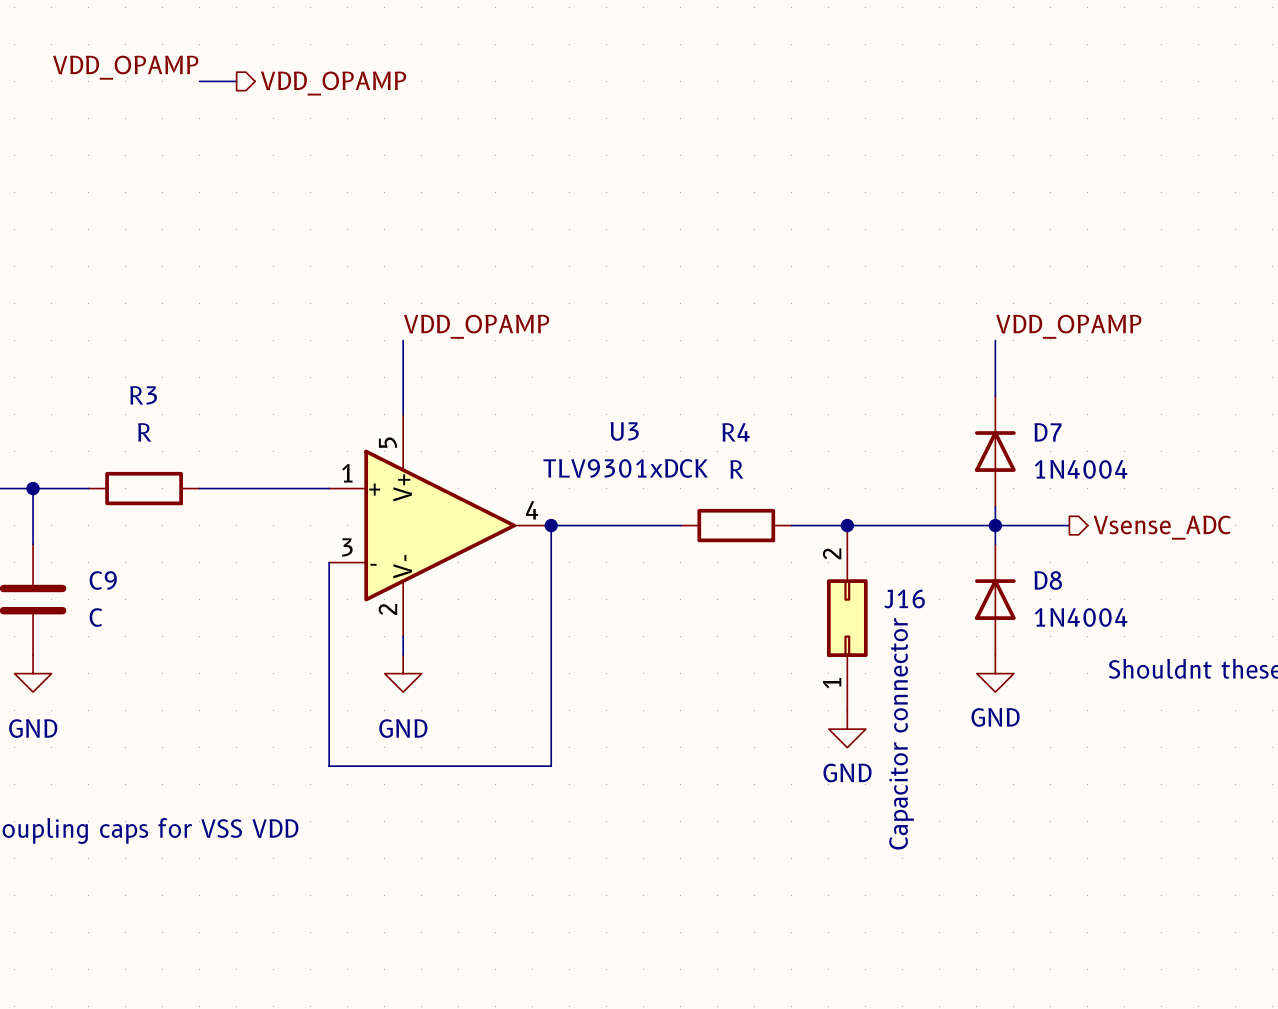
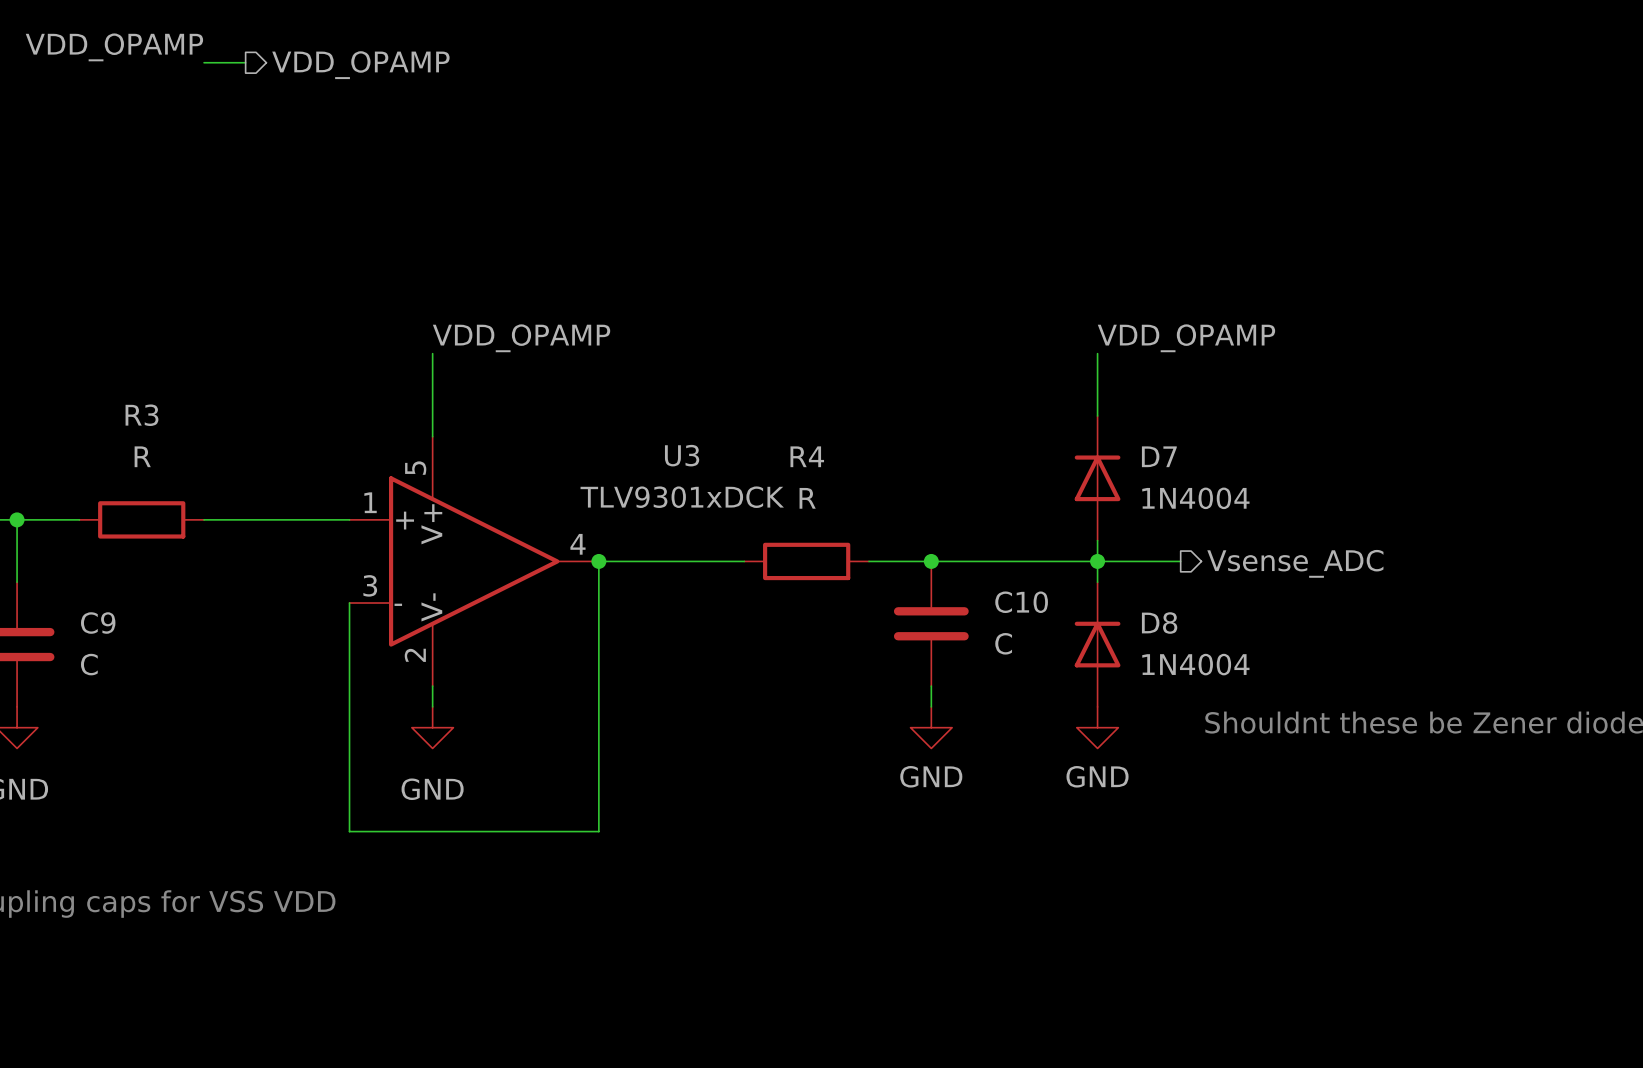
C10: none -> C (931, 623)
J16: Capacitor connector (847, 618) -> none
power symbol position: GND (847, 729) -> GND (931, 727)

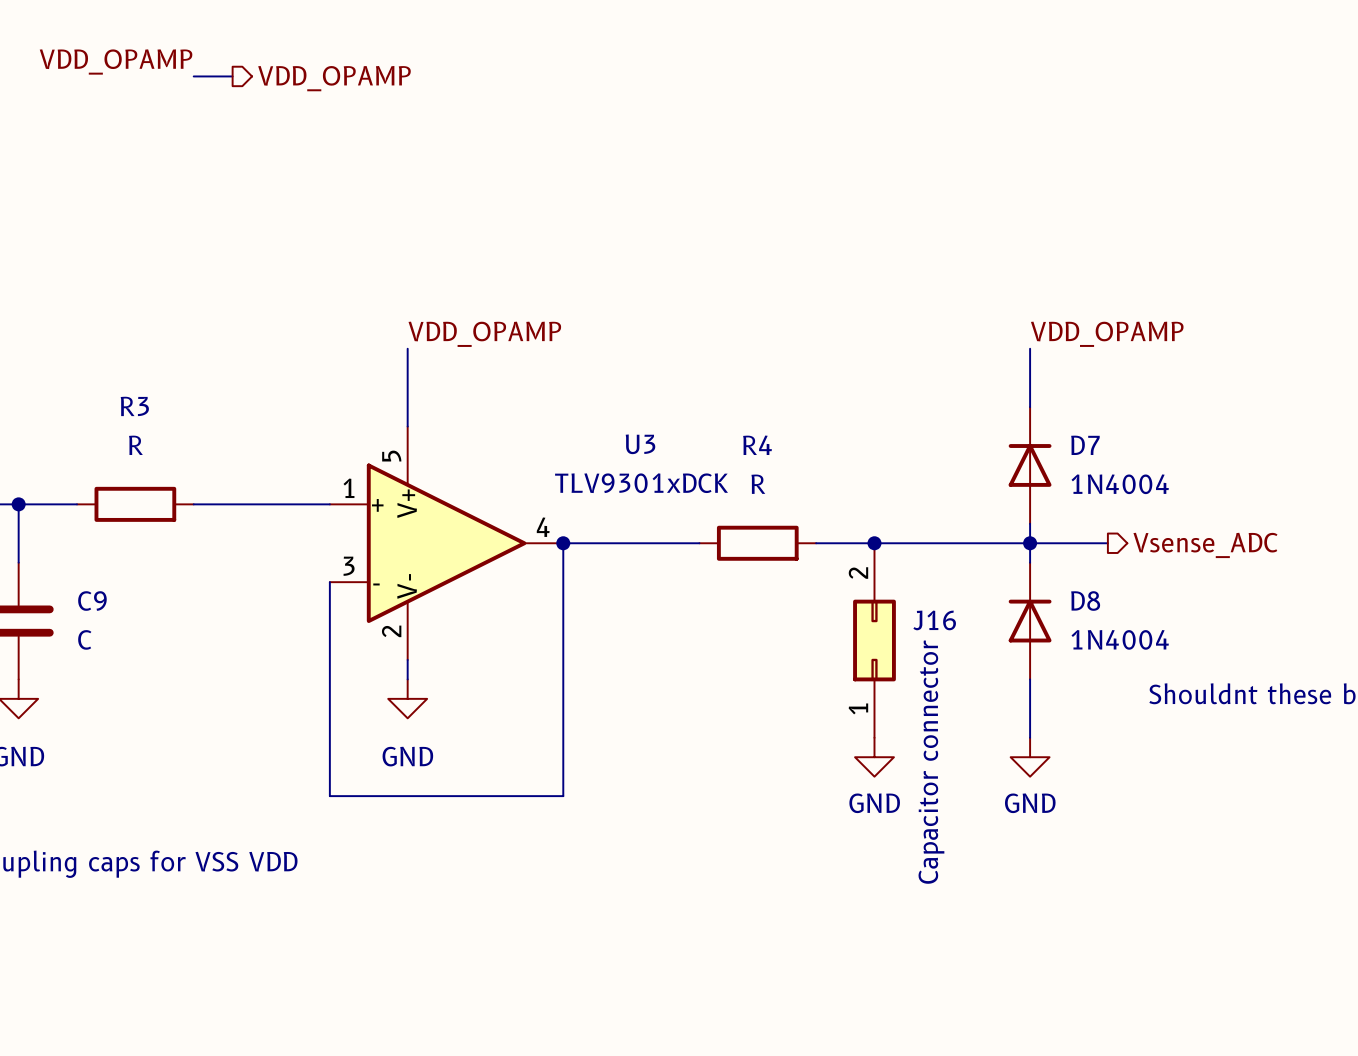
C10: C (931, 623) -> none
J16: none -> Capacitor connector (874, 640)
wire: none -> (1030, 679) (1030, 737)
power symbol position: GND (931, 727) -> GND (874, 757)
power symbol position: GND (1097, 727) -> GND (1030, 757)

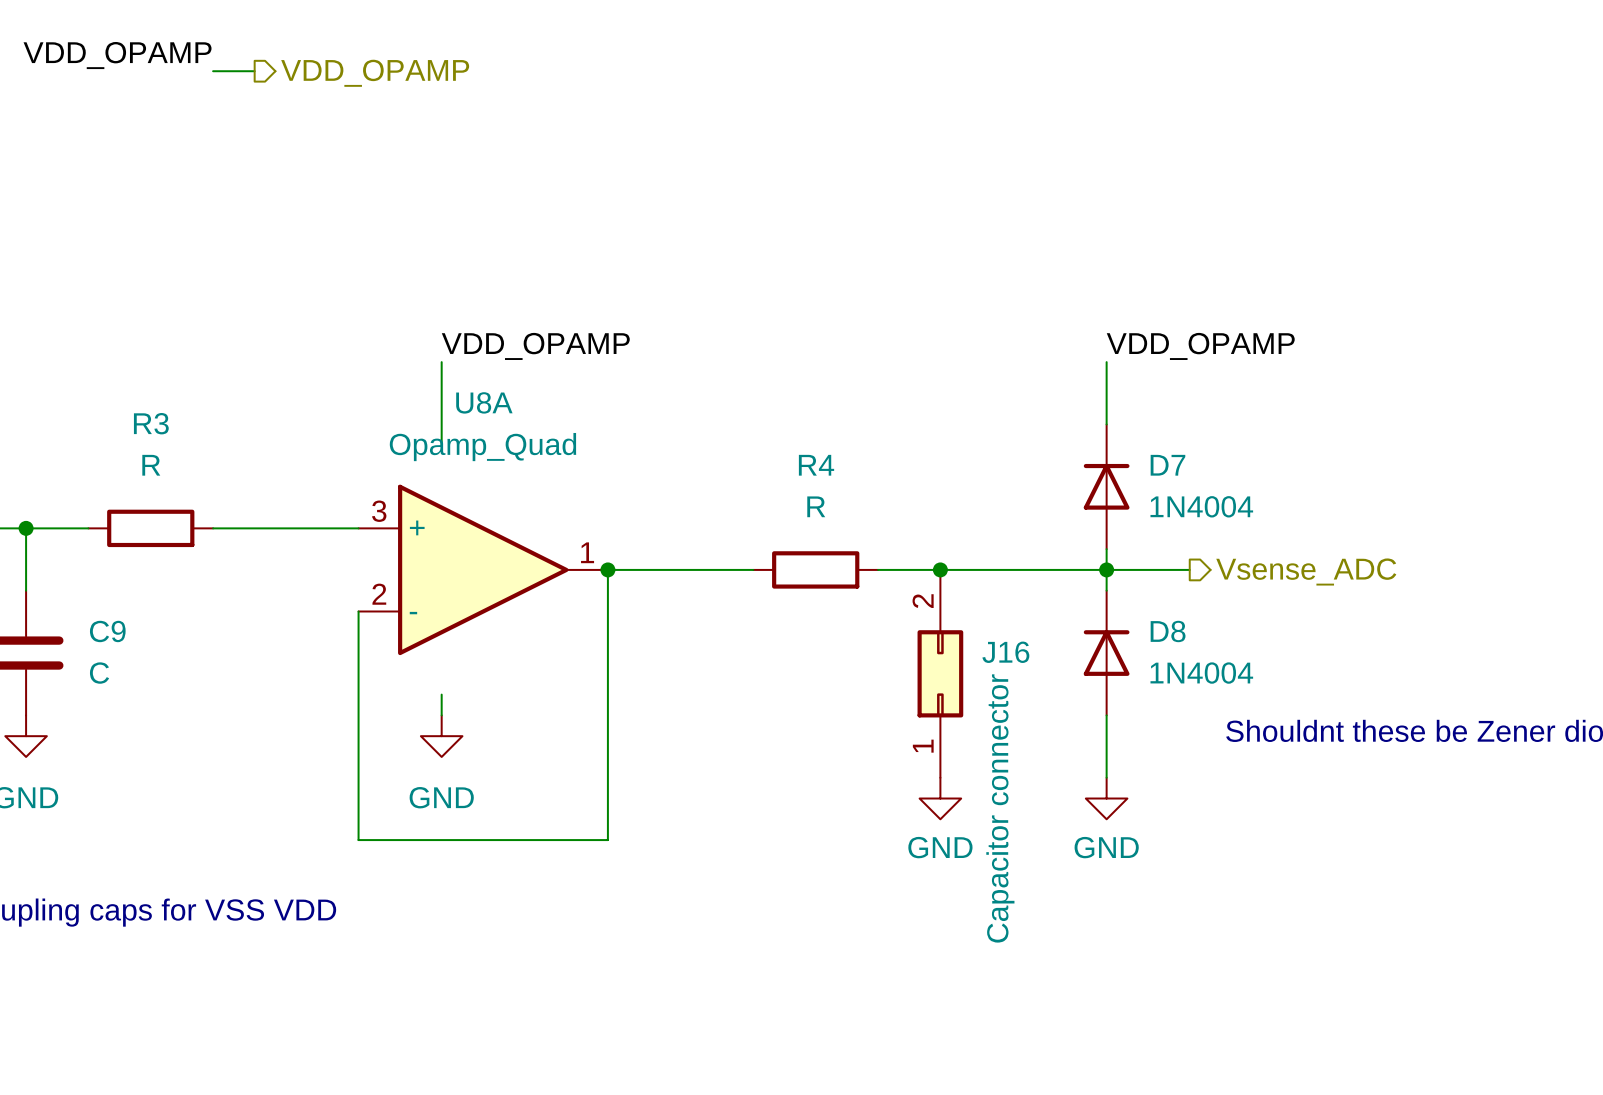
U3: TLV9301xDCK (446, 543) -> none
U8A: none -> Opamp_Quad (483, 569)

